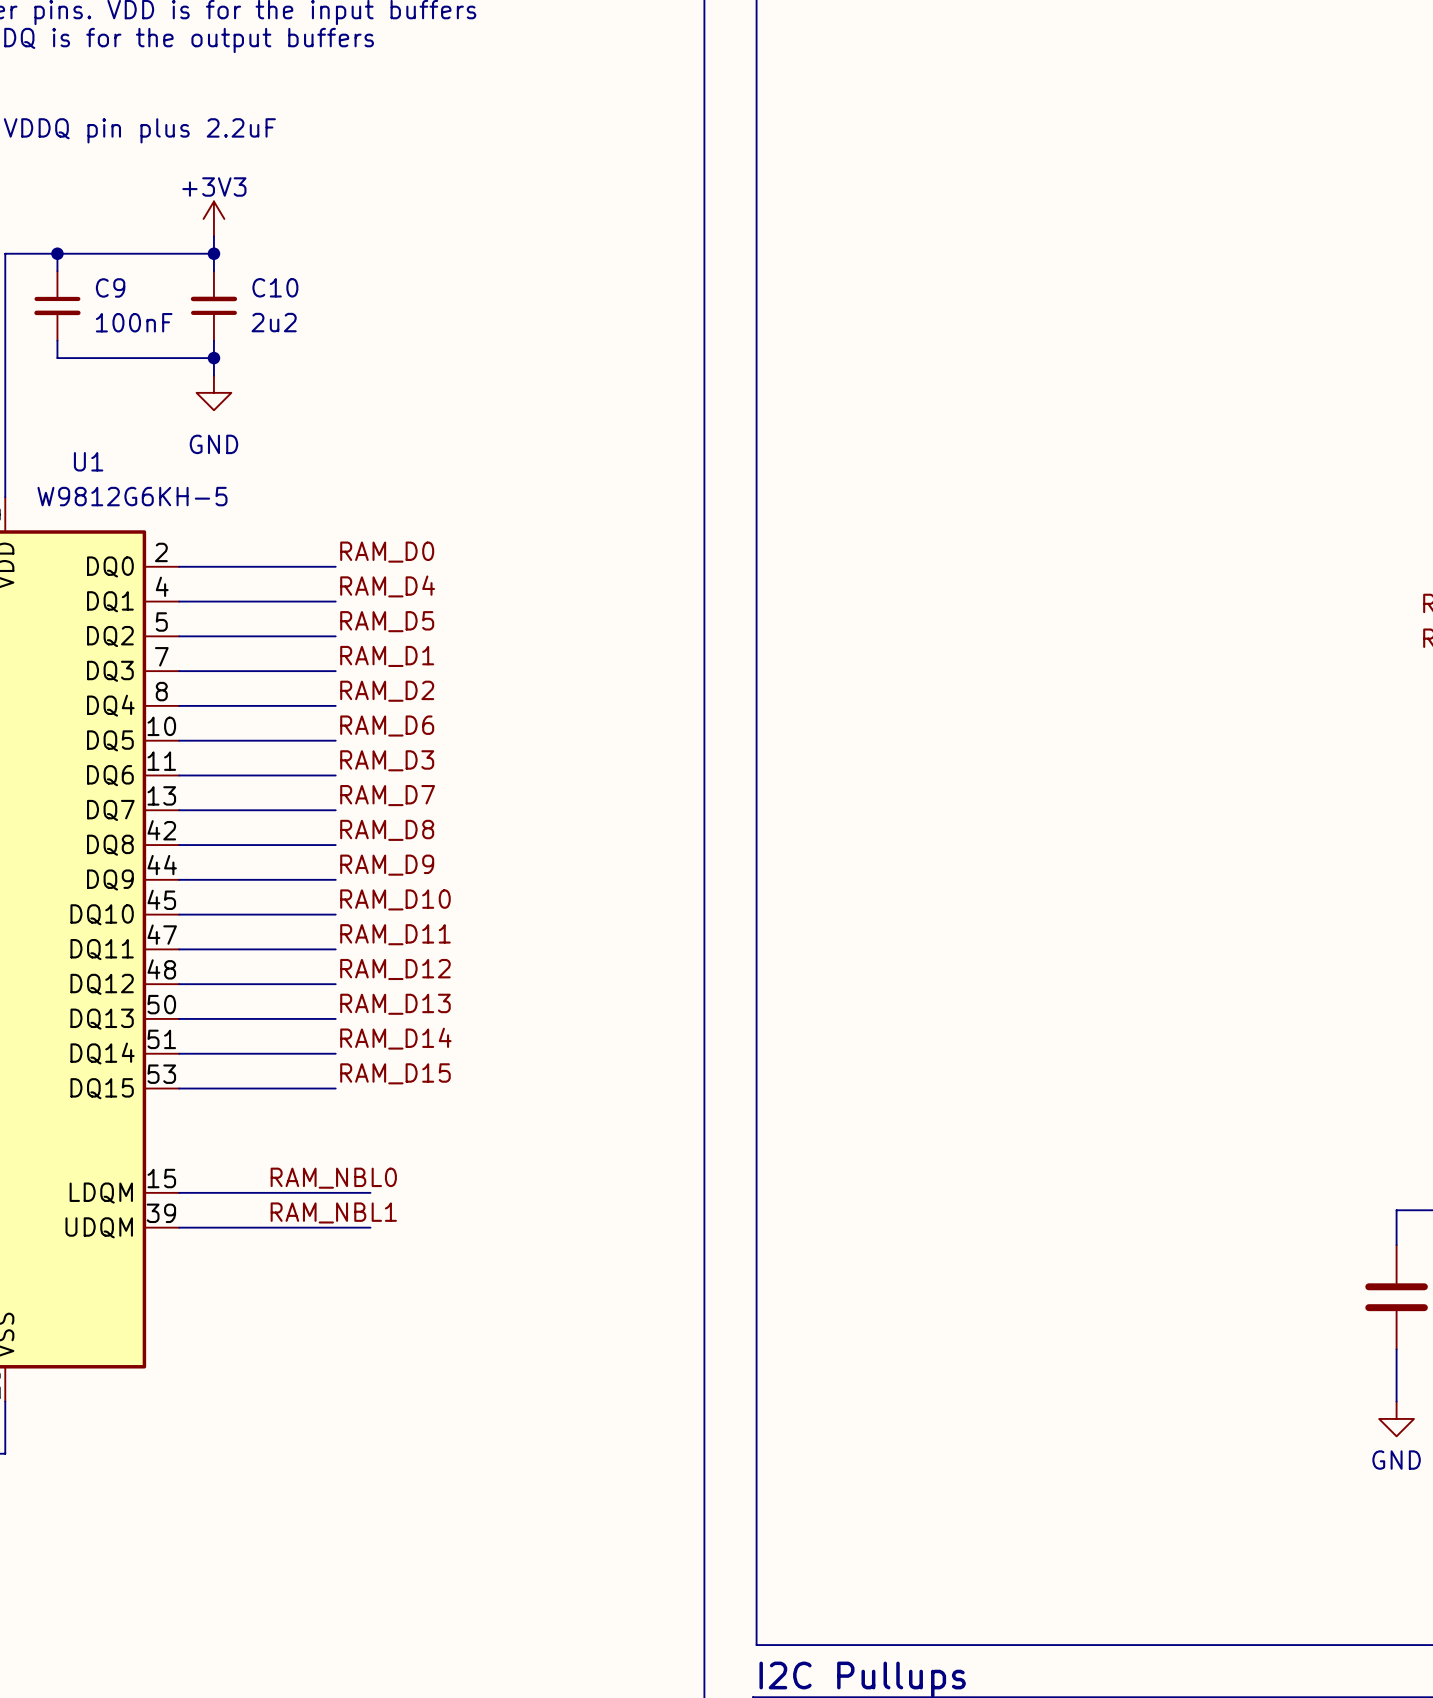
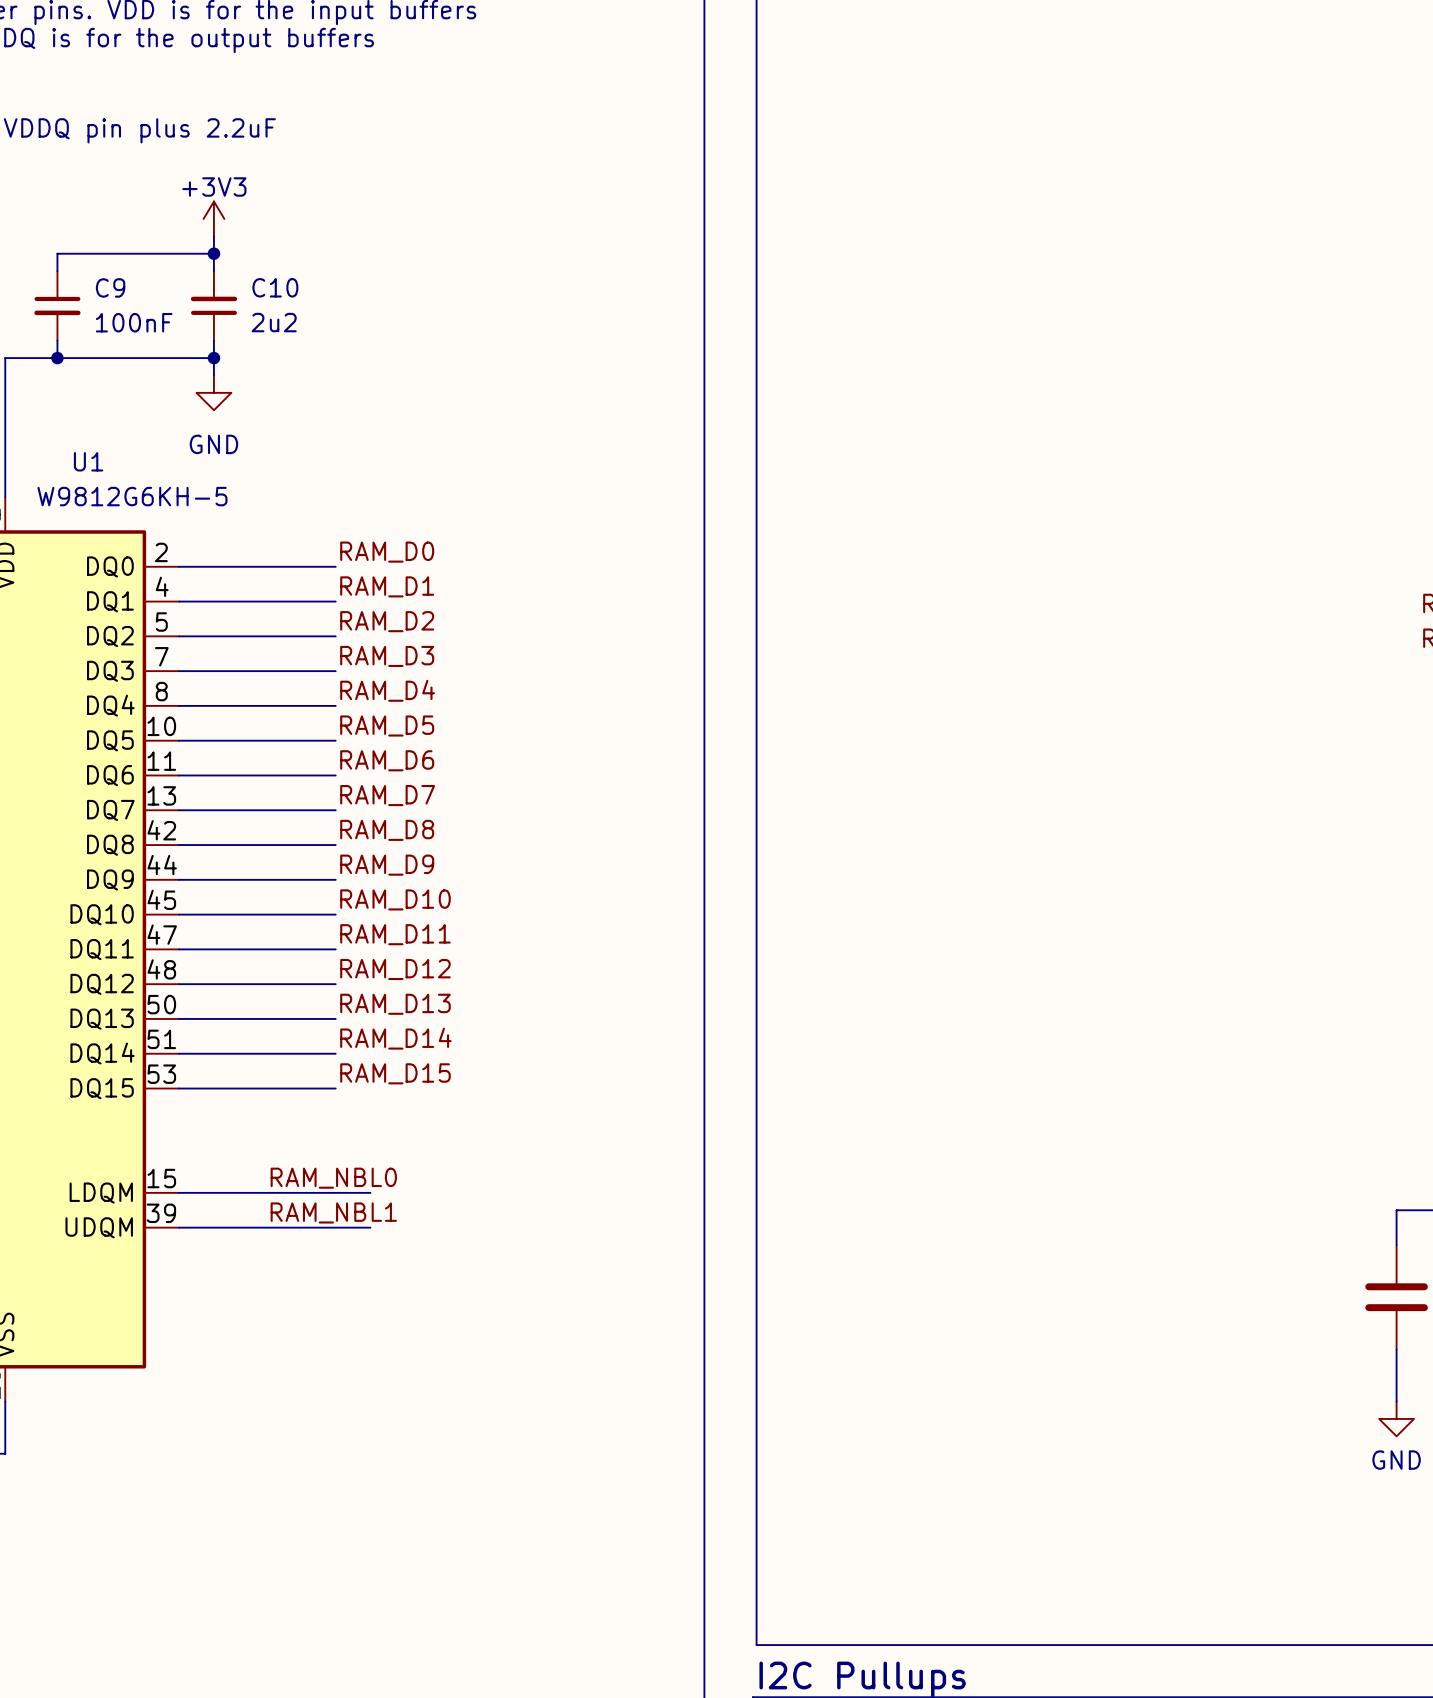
wire: (57, 253) (5, 253) (5, 358) -> (57, 358) (5, 358)
junction: (57, 253) -> none
junction: none -> (57, 358)
label: RAM_D4 (387, 586) -> RAM_D1 (387, 586)
label: RAM_D5 (387, 621) -> RAM_D2 (387, 621)
label: RAM_D1 (387, 656) -> RAM_D3 (387, 656)
label: RAM_D2 (387, 691) -> RAM_D4 (387, 690)
label: RAM_D6 (387, 726) -> RAM_D5 (387, 726)
label: RAM_D3 (387, 760) -> RAM_D6 (387, 760)

